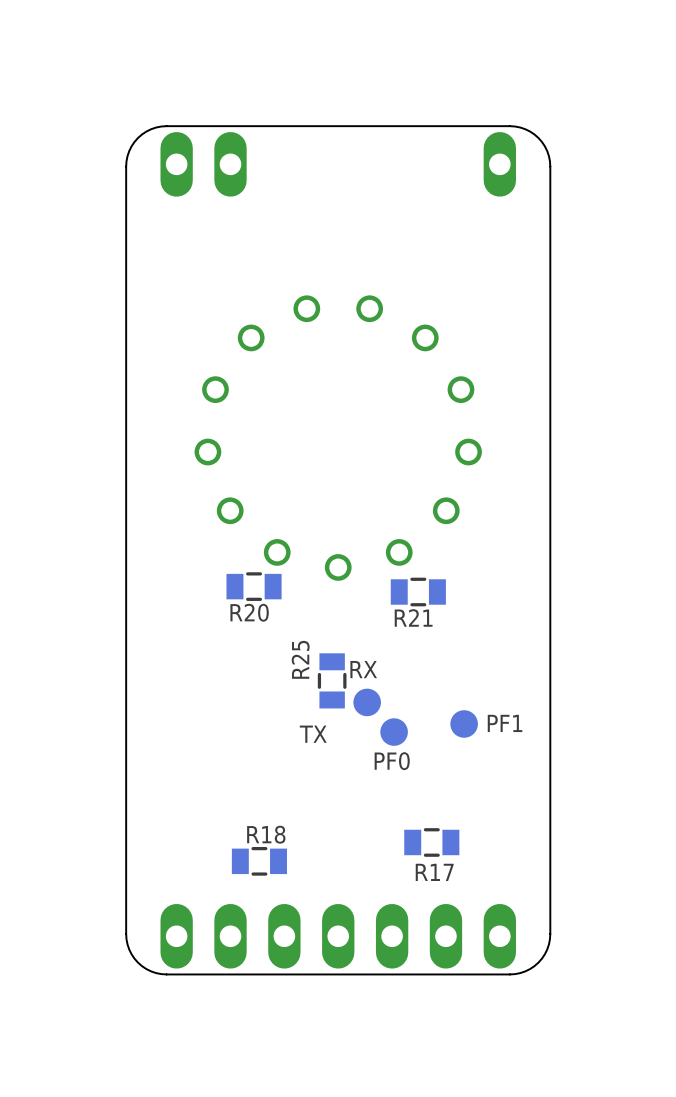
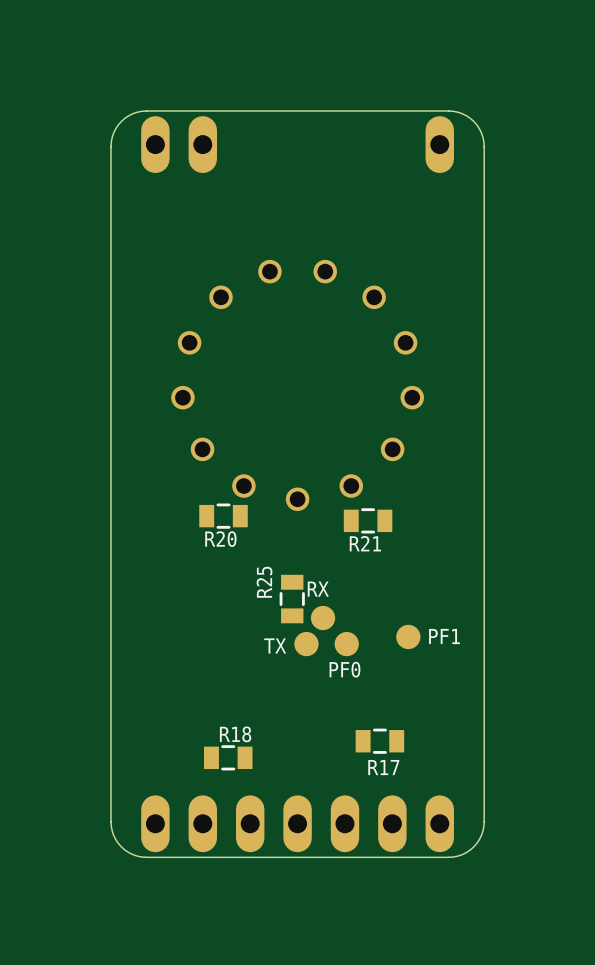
part: none -> (306, 644)

